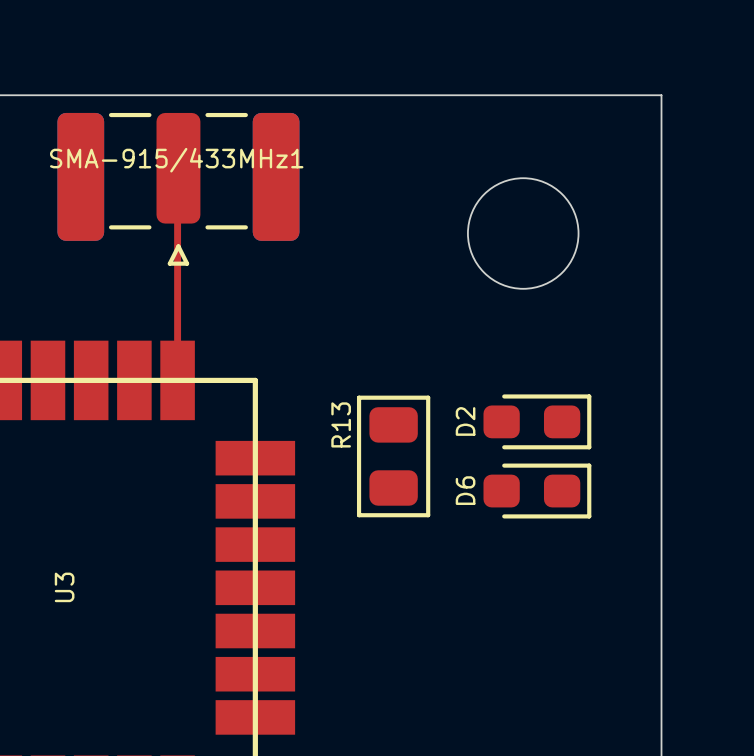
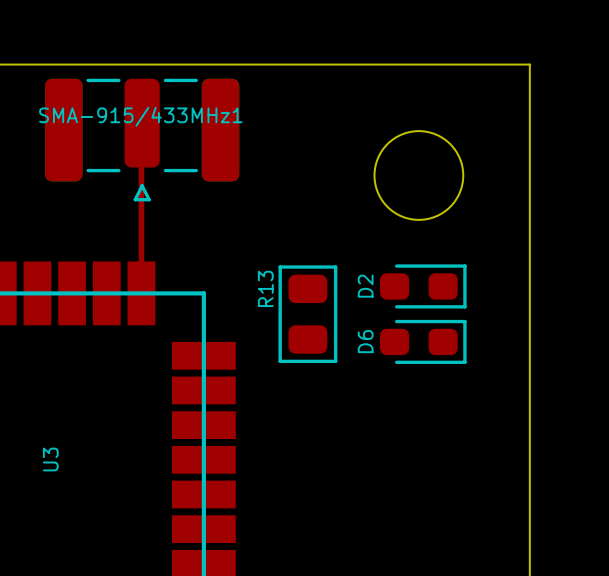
D2 position: (537, 421) -> (423, 286)
R13 position: (393, 456) -> (307, 314)
D6 position: (537, 491) -> (423, 341)

